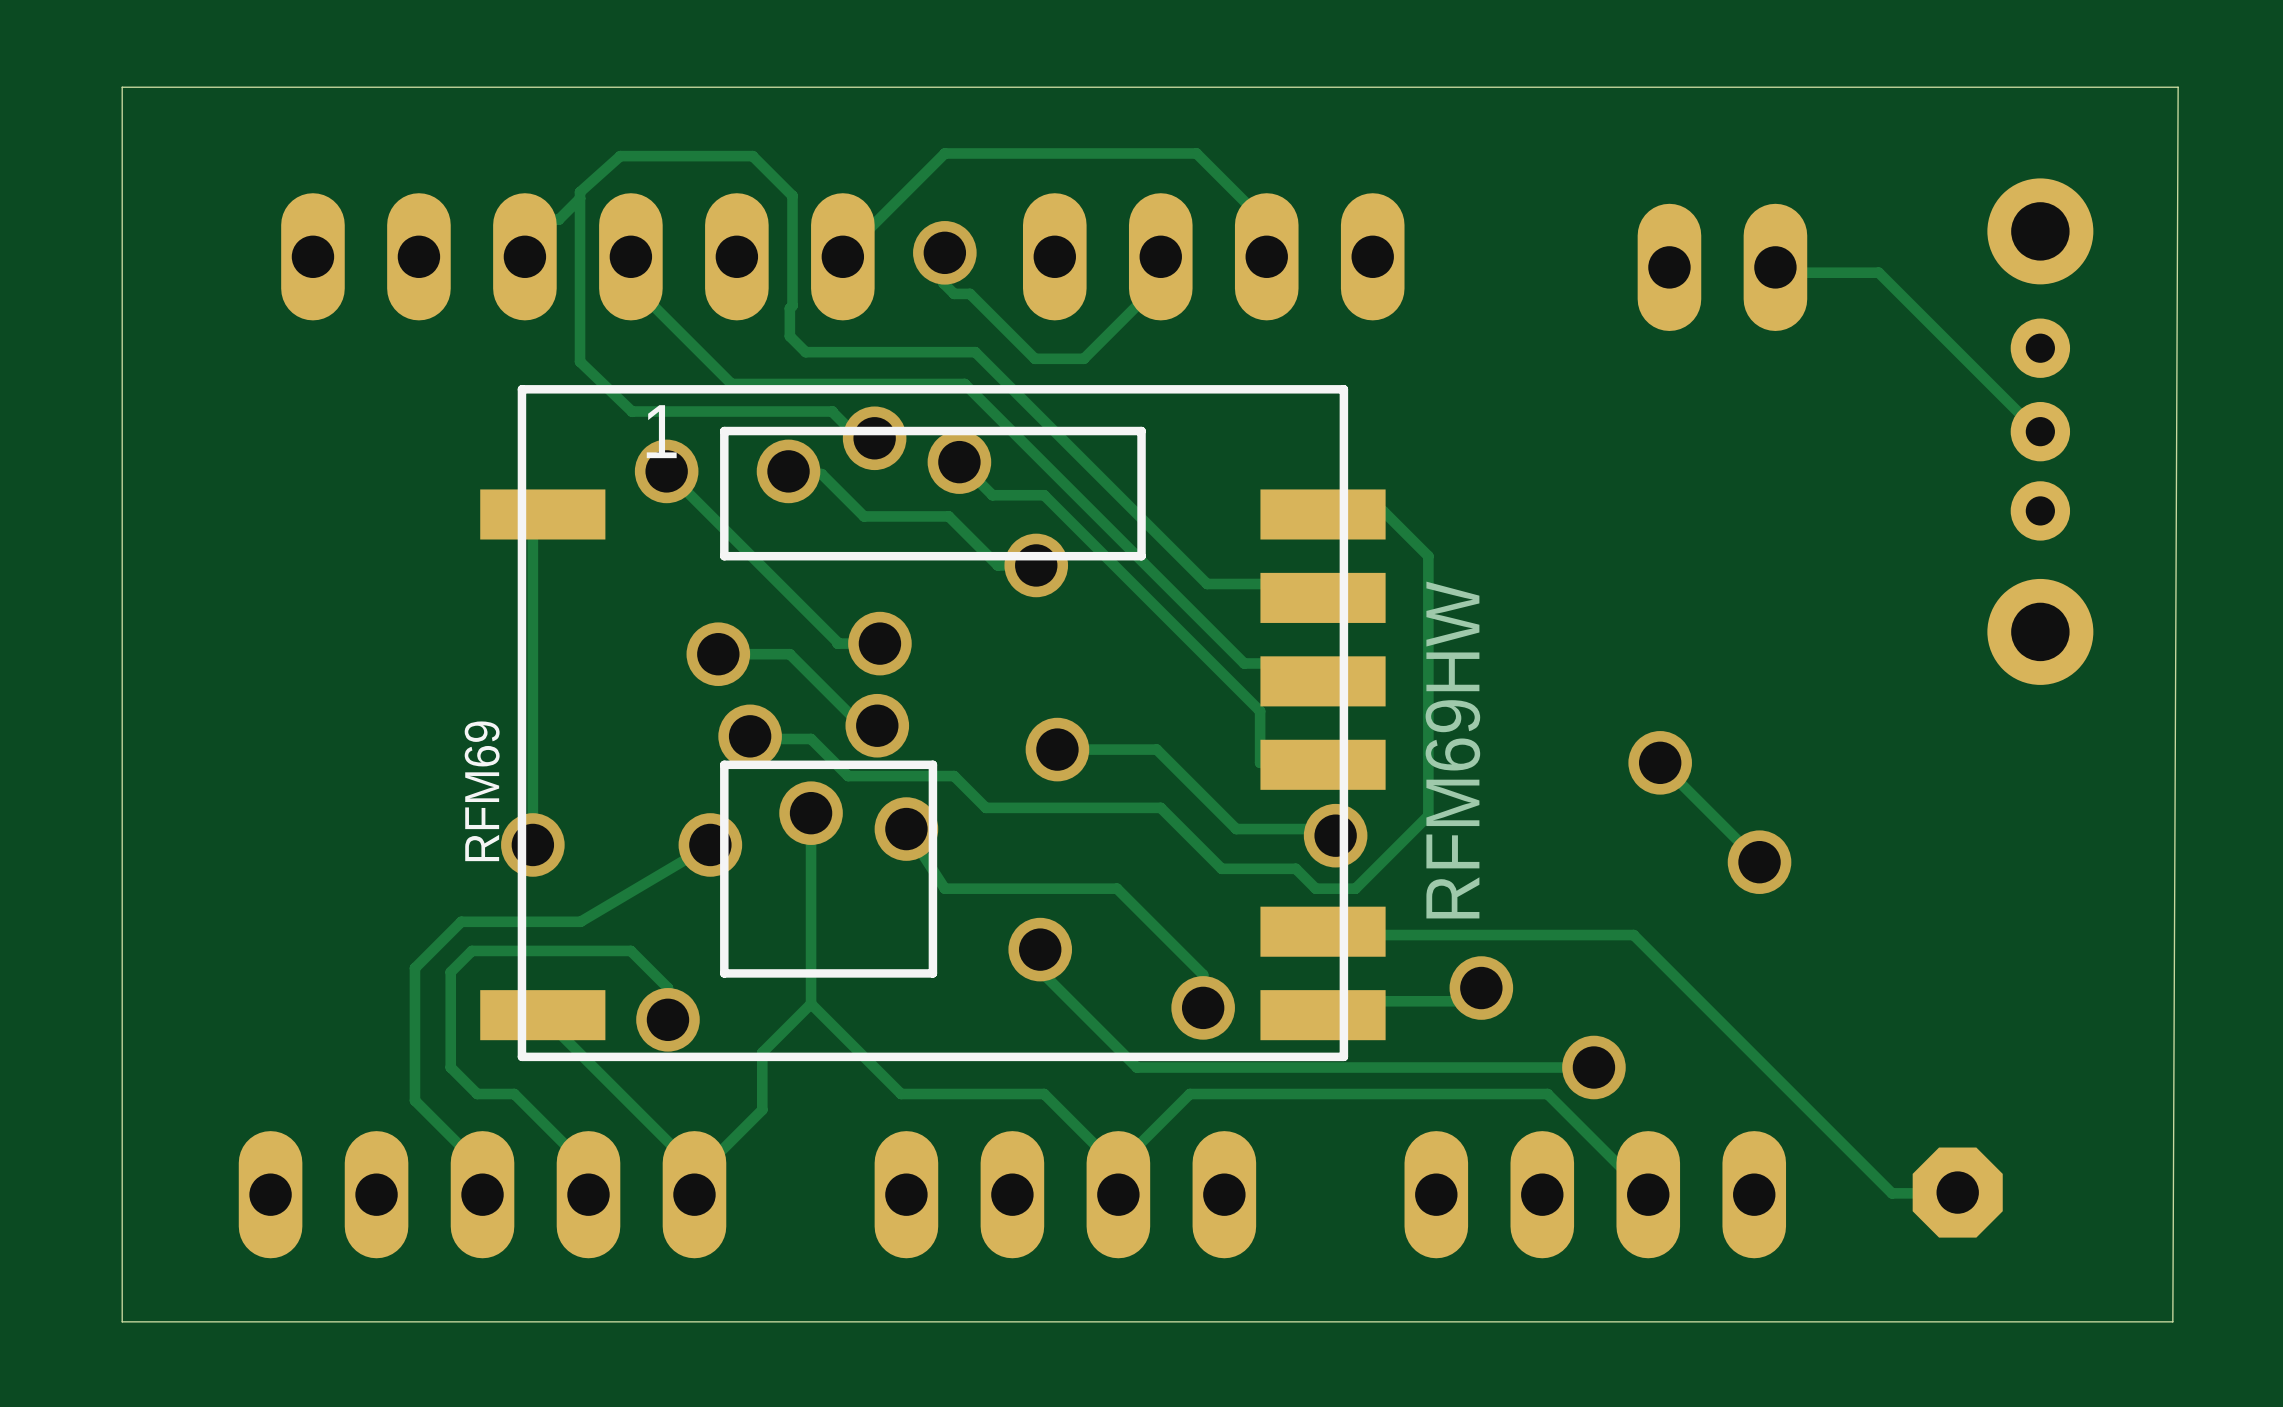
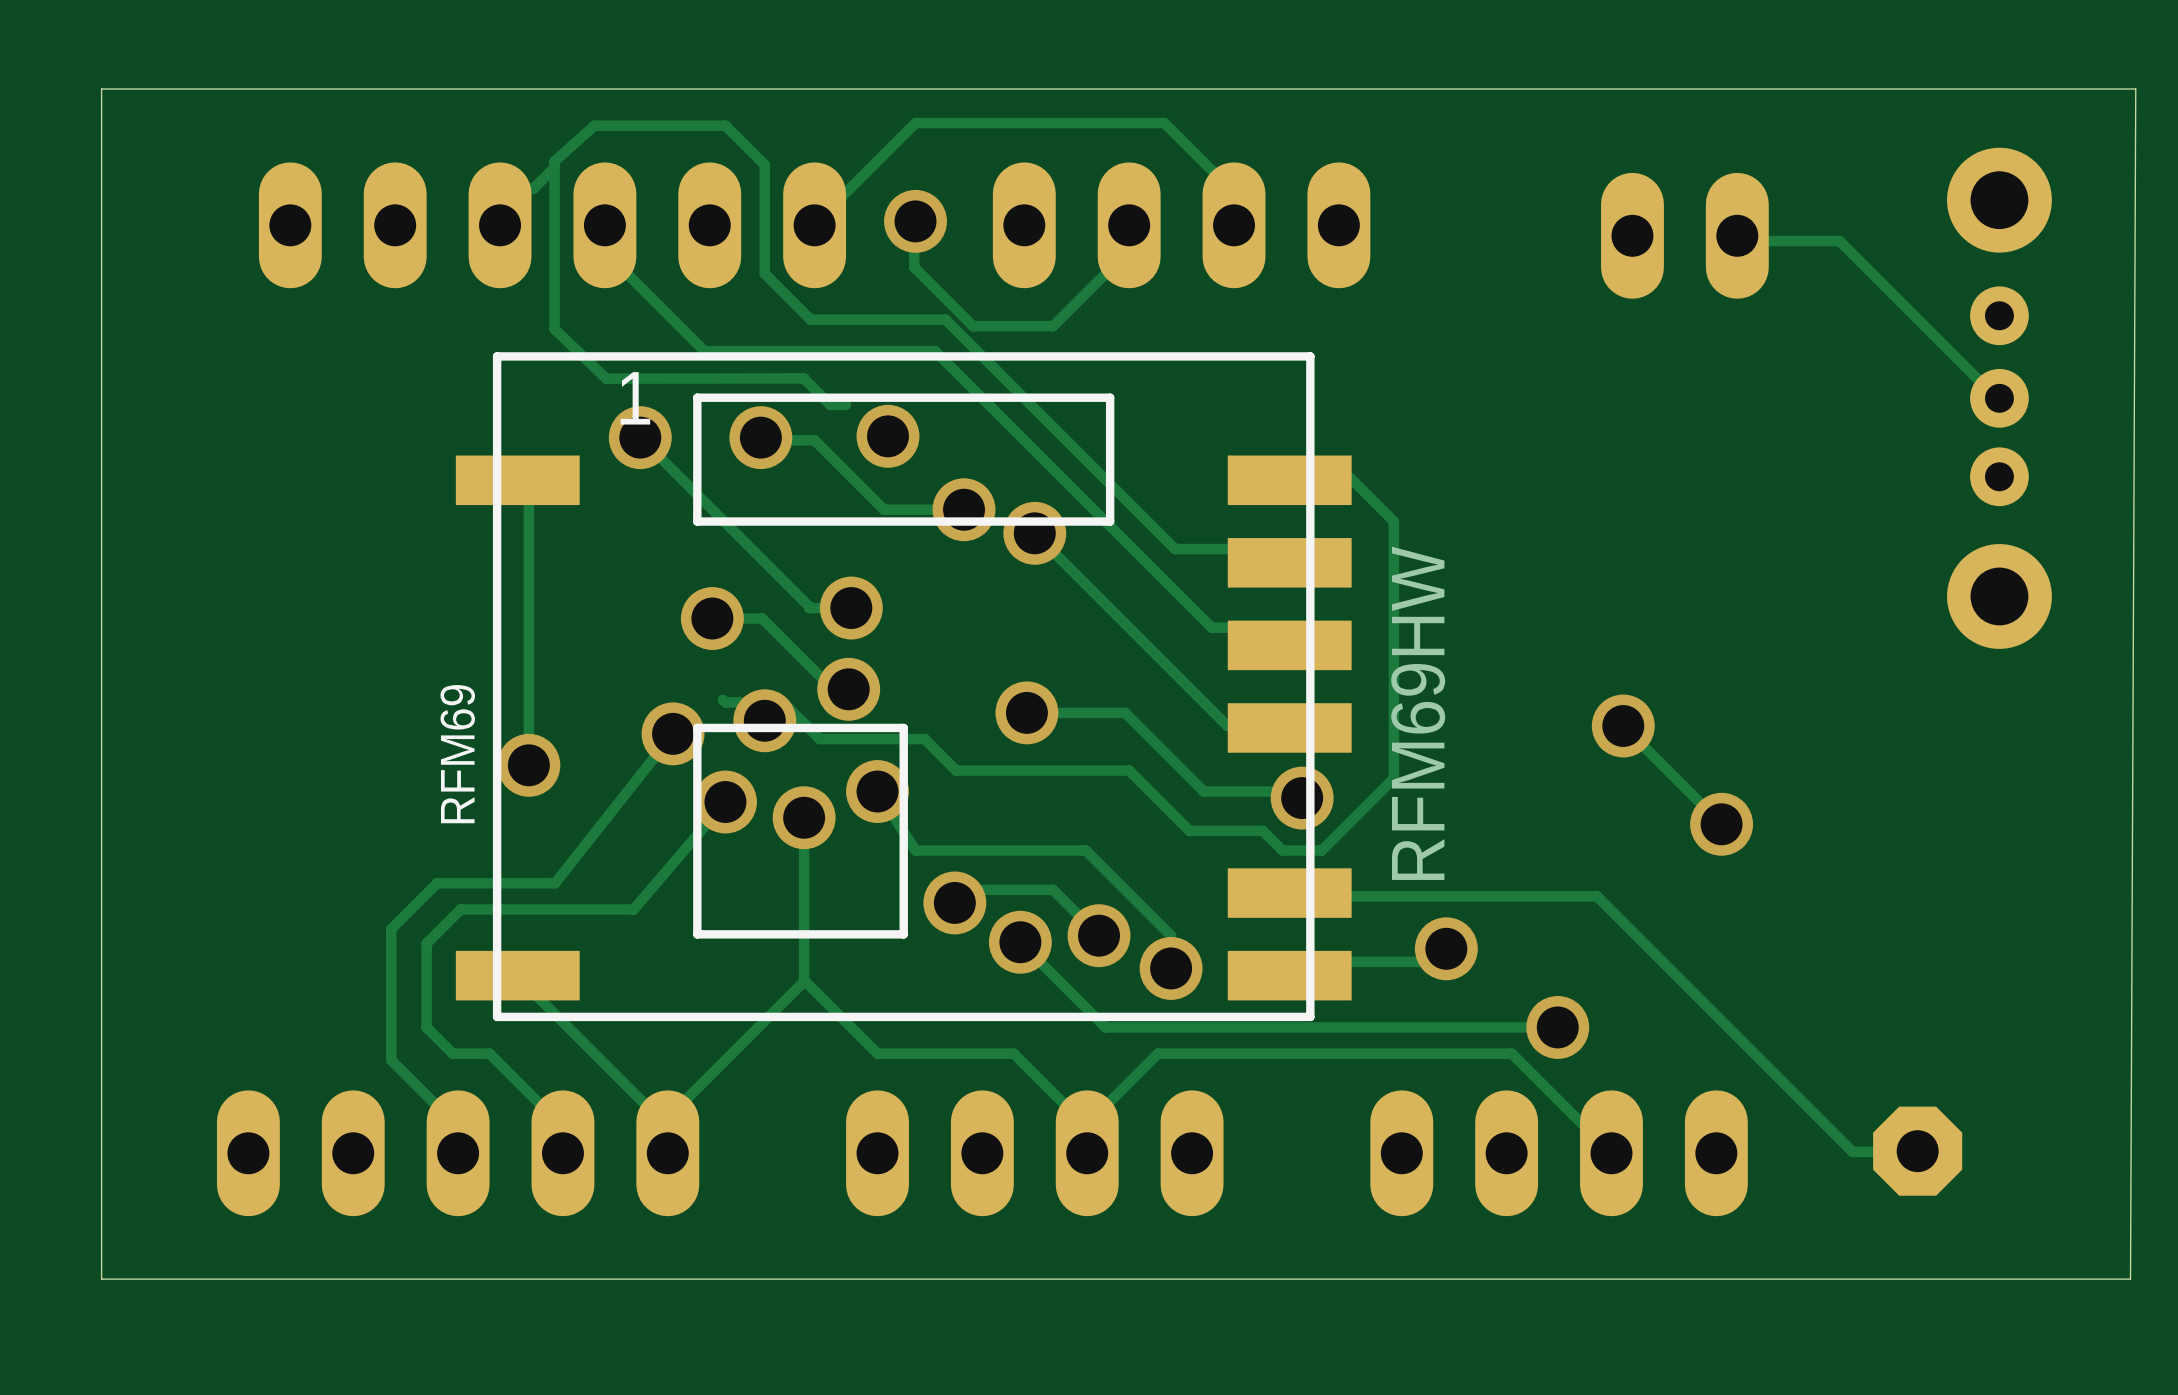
board edge: (122, 119) (122, 87) (2178, 87) (2172, 1321) -> (101, 89) (2135, 89) (2130, 1279)
track: (943, 283) (954, 293) (970, 293) (1034, 358) -> (914, 251) (914, 267) (973, 326) (1004, 326)
track: (792, 305) (789, 308) (789, 336) (805, 352) (838, 352) -> (764, 273) (810, 319)
via: (874, 438) -> none
track: (959, 462) (992, 495) (1044, 495) (1260, 711) (1260, 762) -> (1034, 533) (1227, 725)
via: (959, 462) -> none
via: none -> (888, 436)
track: (821, 474) (864, 516) (948, 516) (997, 565) (1036, 565) -> (793, 440) (814, 440) (884, 509) (964, 509)
track: (547, 517) (532, 517) (532, 844) -> (522, 483) (528, 483) (528, 765)
via: none -> (964, 509)
via: (1036, 565) -> none
via: none -> (1034, 533)
via position: (718, 654) -> (712, 618)
via: (750, 736) -> none
via: none -> (764, 720)
via: none -> (673, 733)
track: (811, 813) (811, 1003) -> none
via: (811, 813) -> none
via: none -> (725, 802)
via position: (532, 844) -> (528, 765)
track: (710, 844) (580, 921) -> (673, 733) (555, 883)
via: (710, 844) -> none
track: none -> (804, 817) (804, 981) (666, 1119)
via: none -> (804, 817)
track: none -> (954, 902) (967, 889) (1053, 889) (1099, 935)
via: none -> (954, 902)
via: (1040, 949) -> none
via: none -> (1099, 935)
via: none -> (1020, 942)
track: (450, 982) (450, 972) (471, 950) (630, 950) (667, 988) (667, 1019) -> (426, 943) (460, 909) (633, 909) (725, 802)
track: (811, 1003) (901, 1094) (906, 1094) -> (804, 980) (877, 1053)
track: (811, 1003) (762, 1052) (762, 1109) (694, 1177) (694, 1194) -> none
via: (667, 1019) -> none

